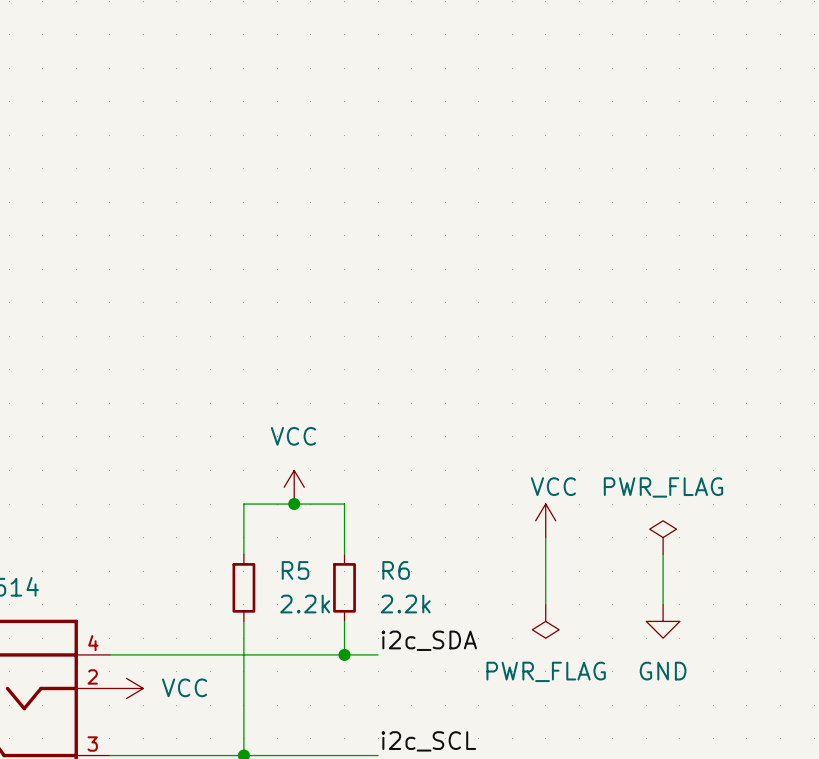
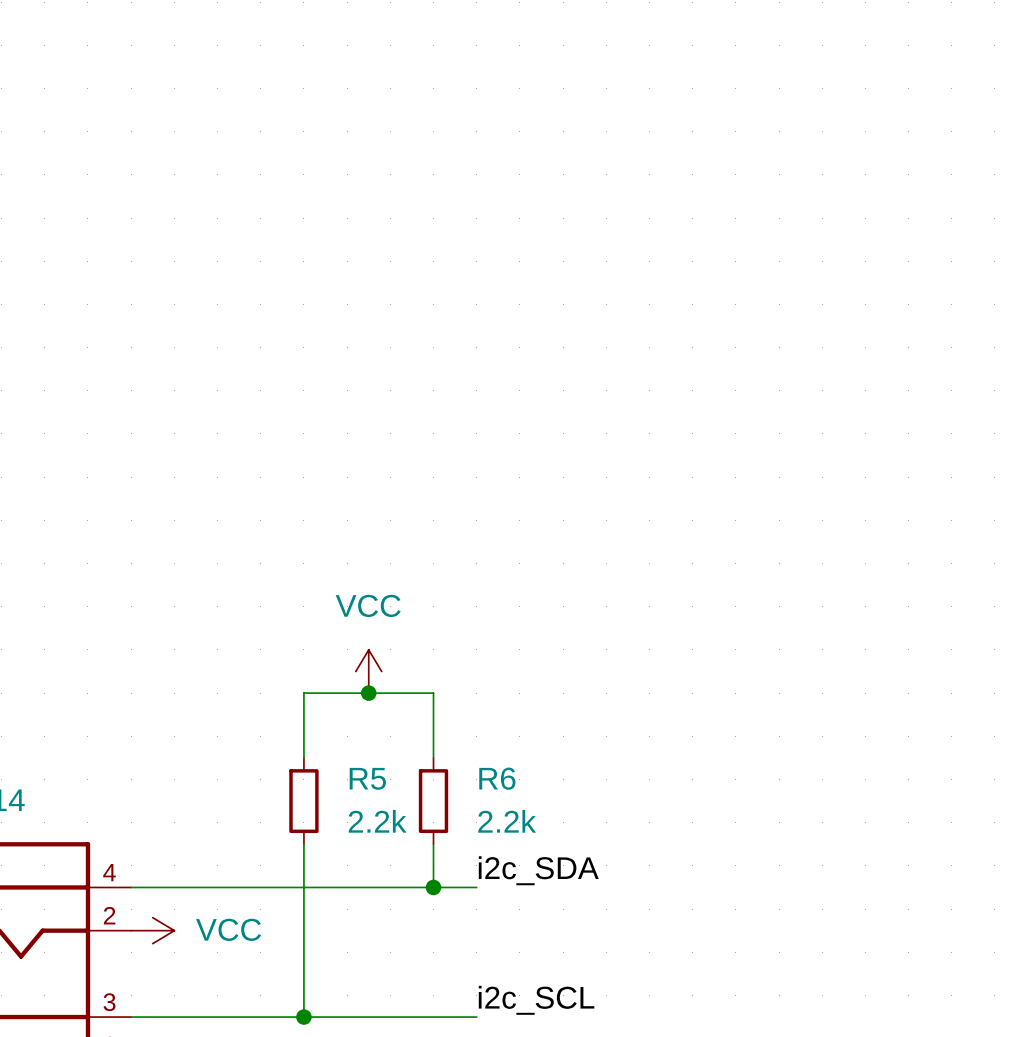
power symbol: VCC (545, 520) -> none
wire: (545, 537) (545, 604) -> none
power symbol: PWR_FLAG (663, 537) -> none
wire: (663, 554) (663, 604) -> none
power symbol: PWR_FLAG (545, 621) -> none
power symbol: GND (663, 621) -> none

